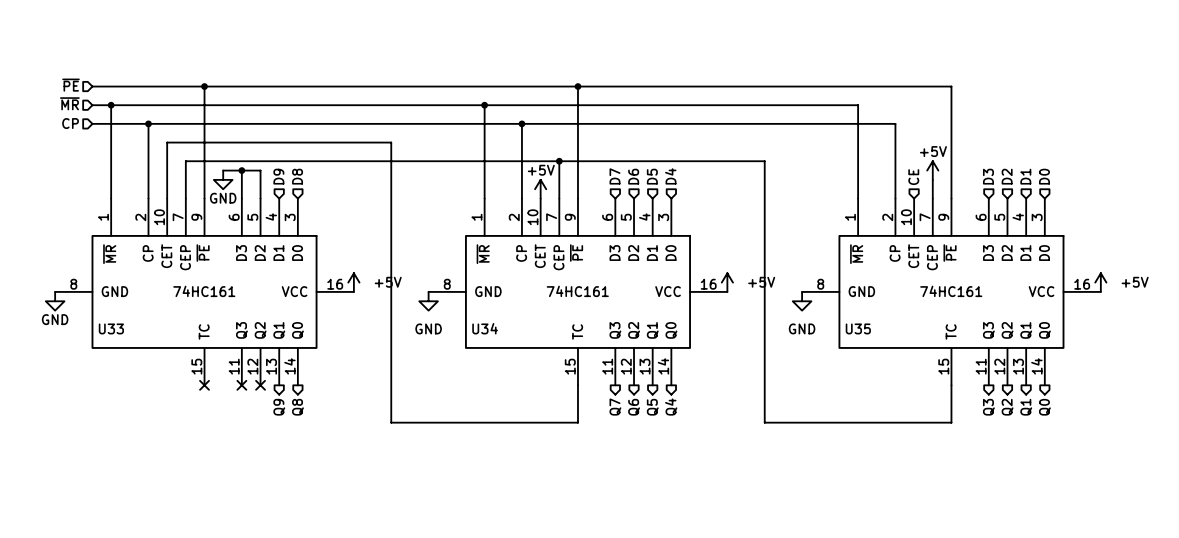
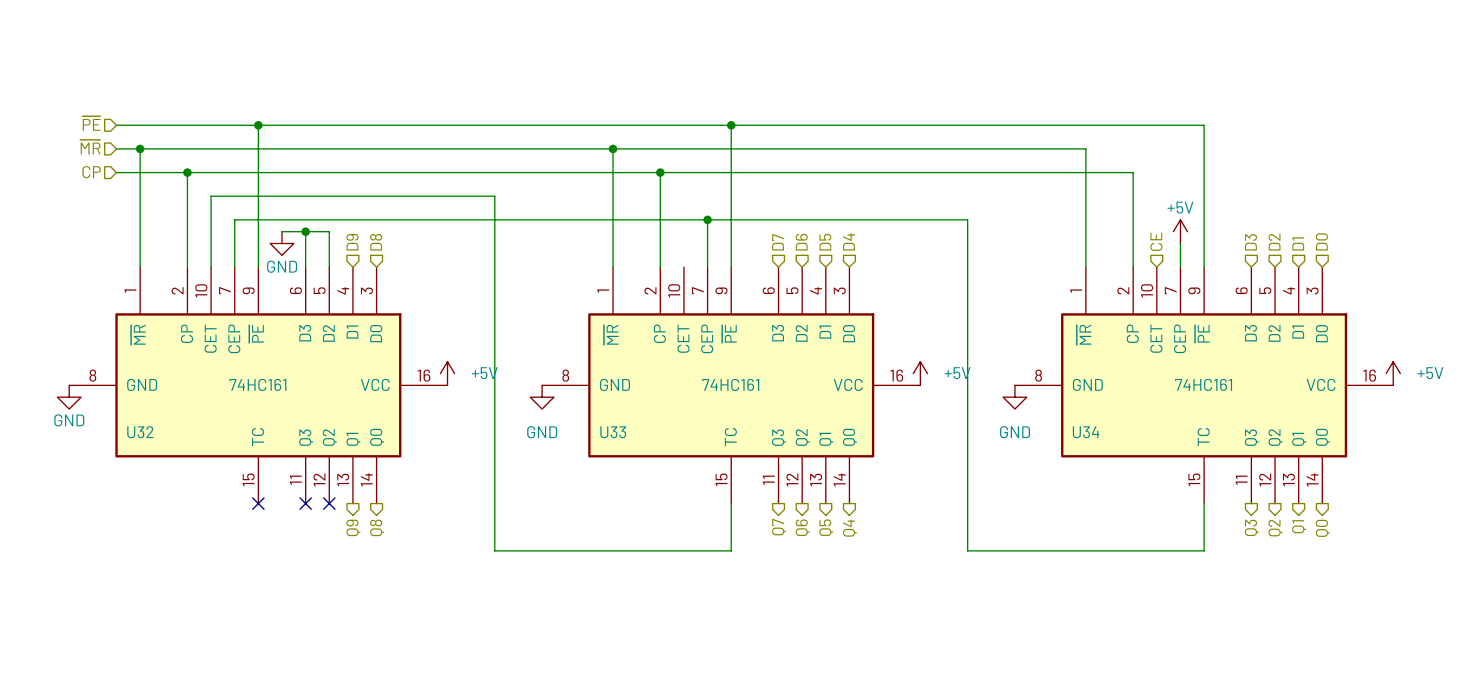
power symbol: +5V (540, 189) -> none
U33 name: U33 (111, 328) -> U32 (140, 432)
U34 name: U34 (485, 328) -> U33 (613, 432)
U35 name: U35 (858, 328) -> U34 (1086, 432)

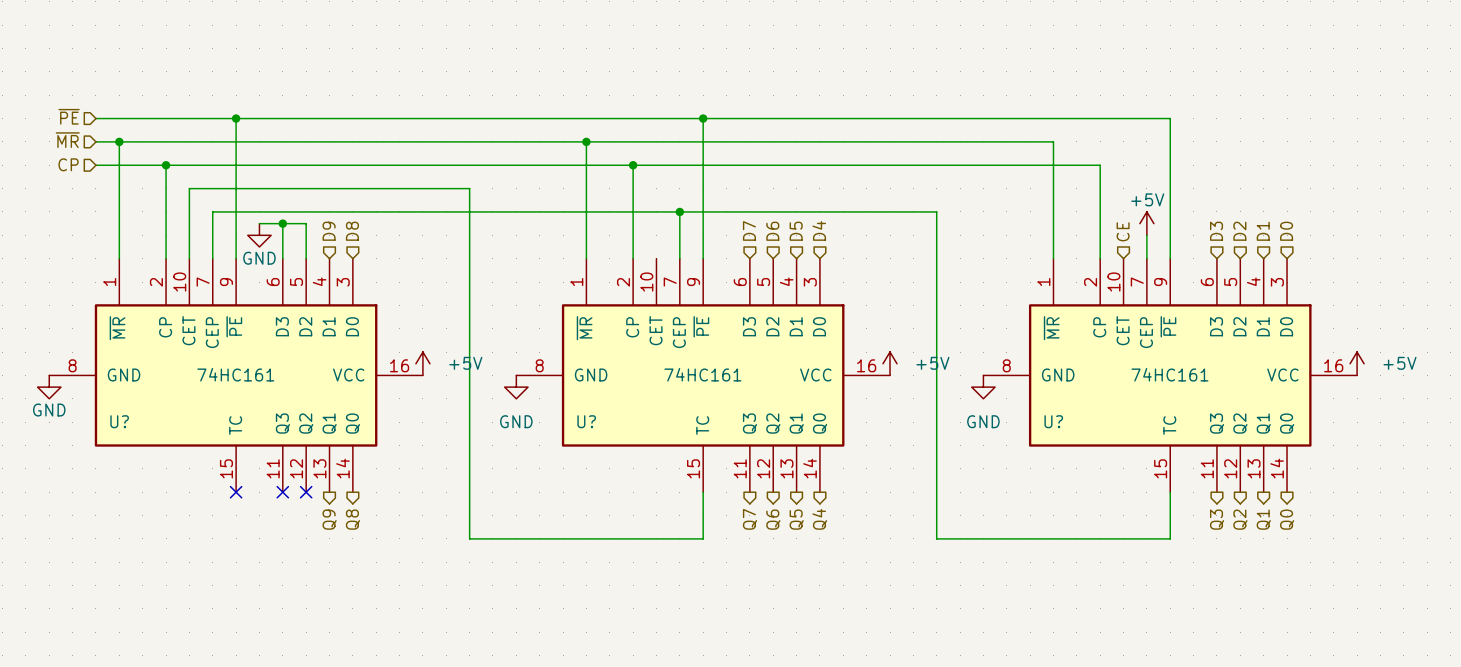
U32 name: U32 (140, 432) -> U? (119, 421)
U33 name: U33 (613, 432) -> U? (586, 421)
U34 name: U34 (1086, 432) -> U? (1053, 421)

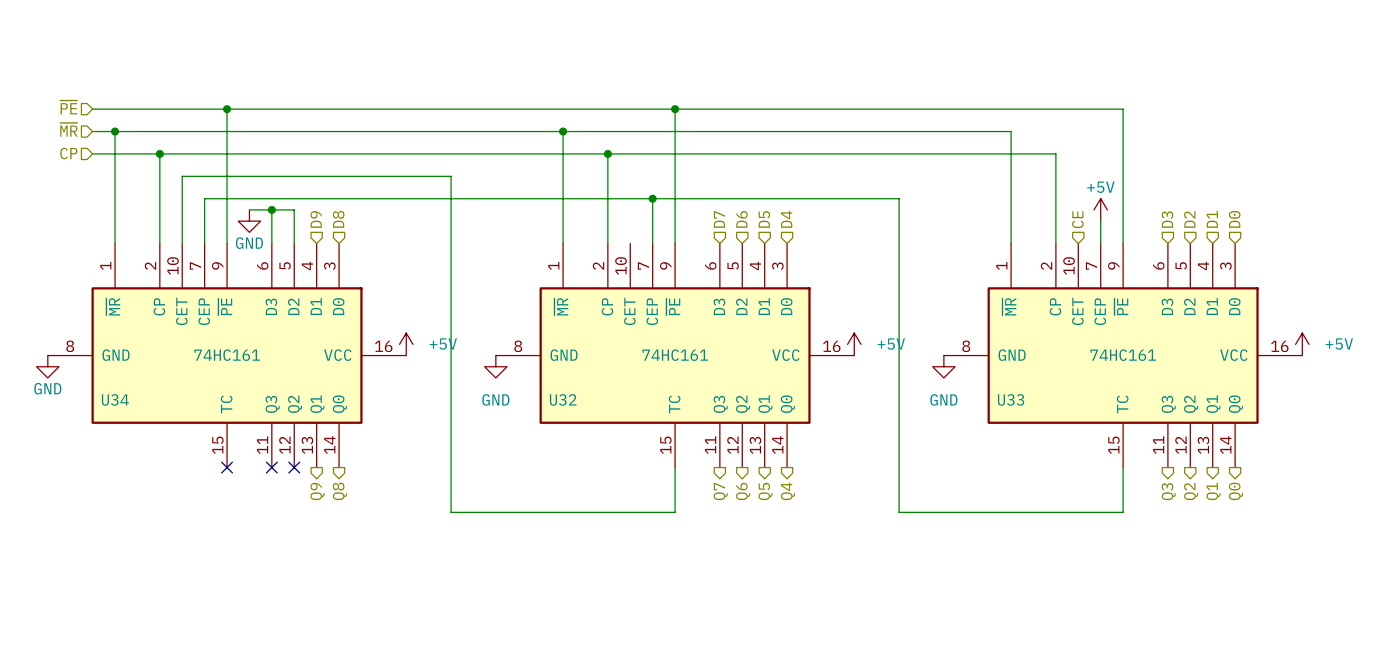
U? name: U? (119, 421) -> U34 (115, 399)
U? name: U? (586, 421) -> U32 (563, 399)
U? name: U? (1053, 421) -> U33 (1011, 399)

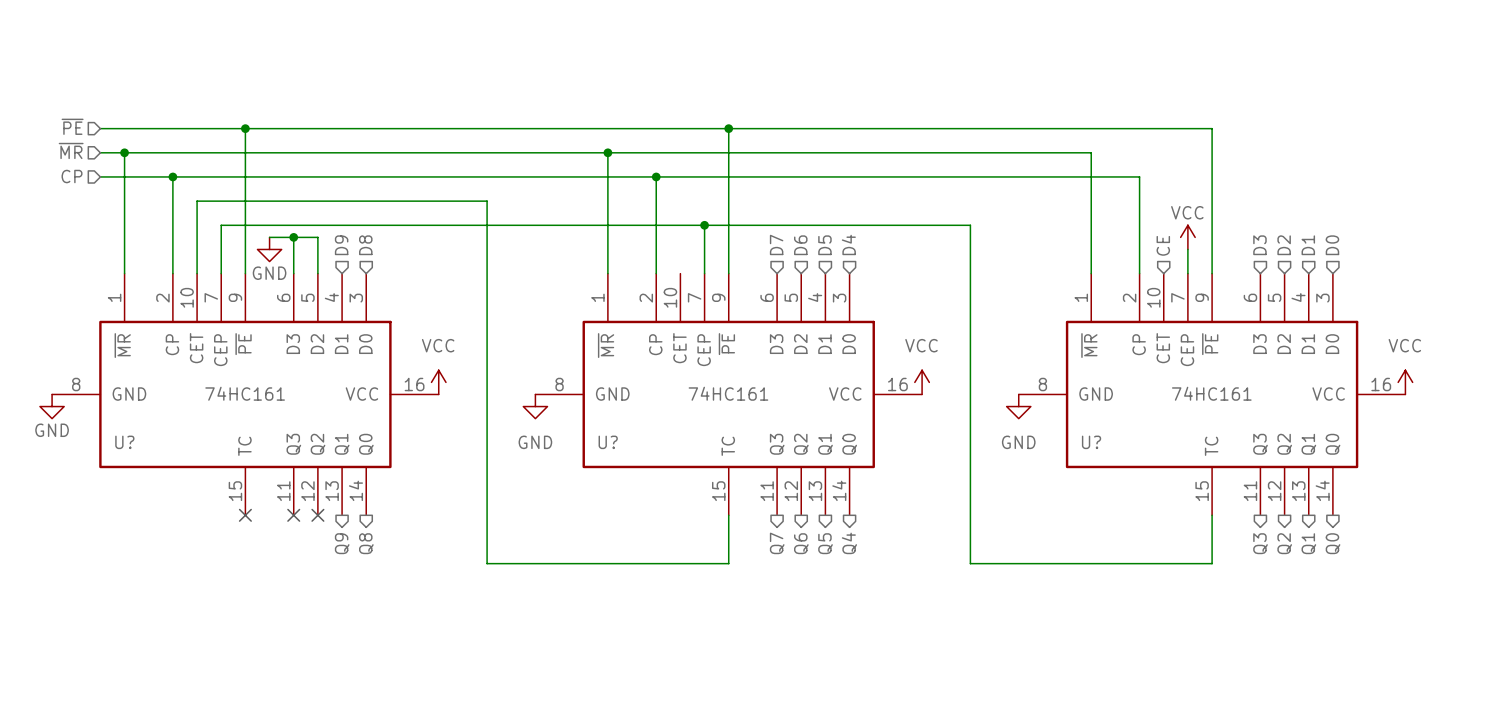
power symbol: +5V (1100, 209) -> VCC (1187, 237)
power symbol: +5V (406, 344) -> VCC (438, 382)
power symbol: +5V (854, 344) -> VCC (922, 382)
power symbol: +5V (1302, 344) -> VCC (1405, 382)
U34 name: U34 (115, 399) -> U? (124, 442)
U32 name: U32 (563, 399) -> U? (608, 442)
U33 name: U33 (1011, 399) -> U? (1091, 442)

